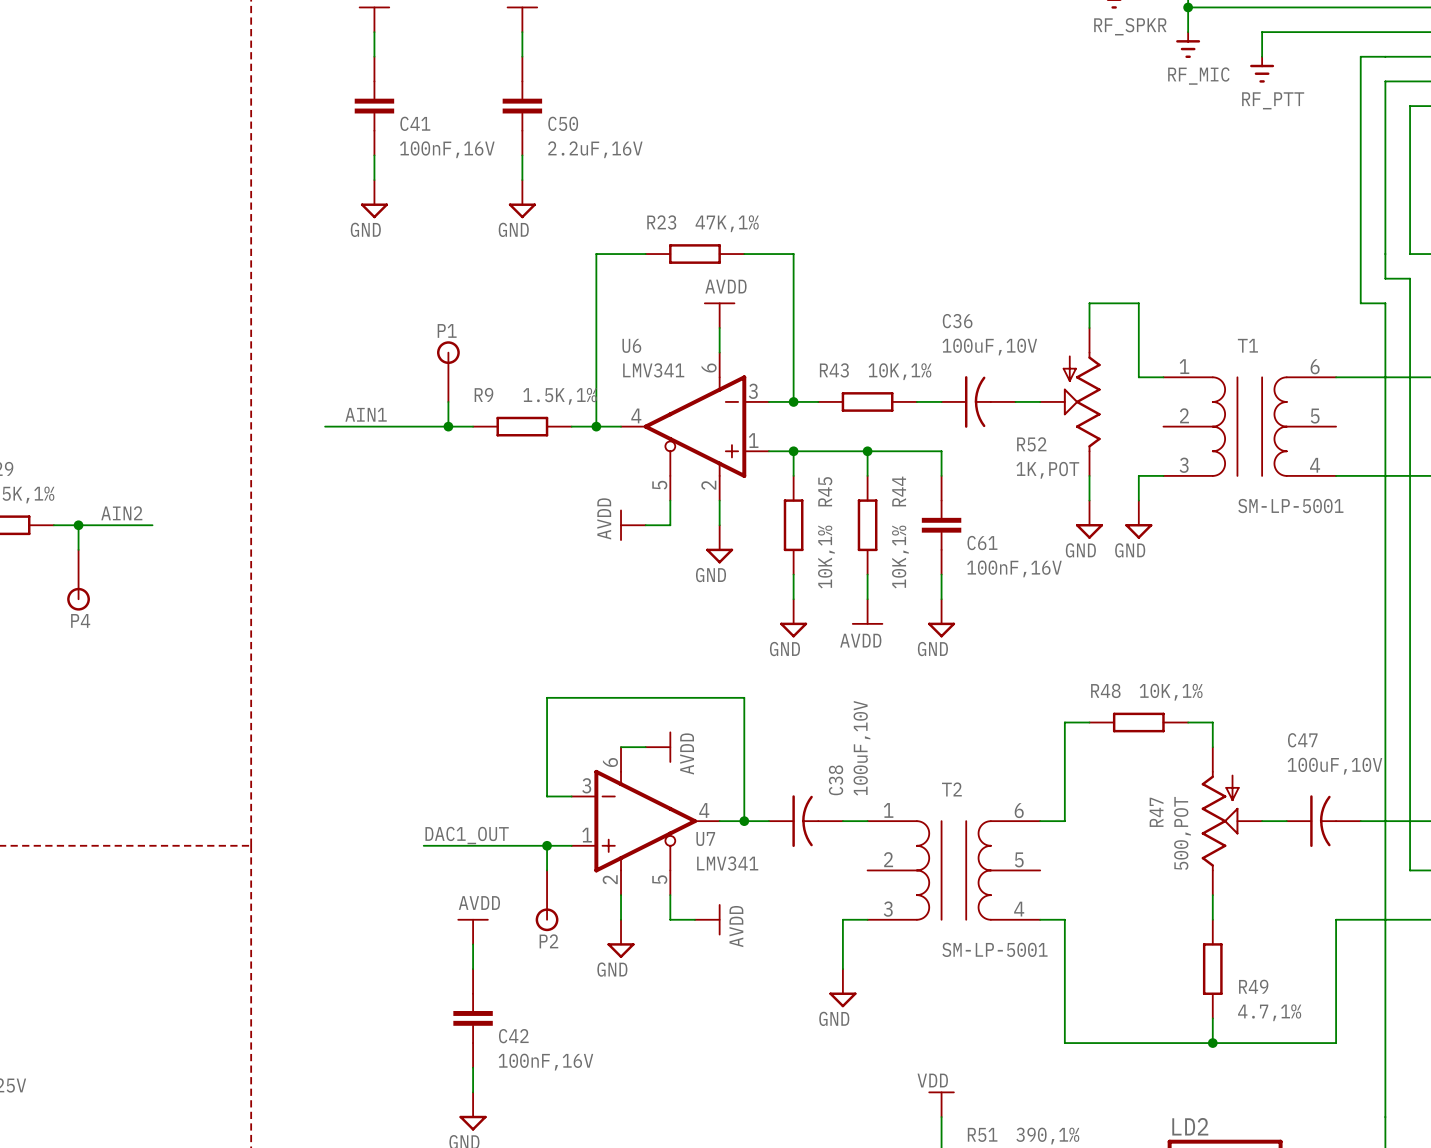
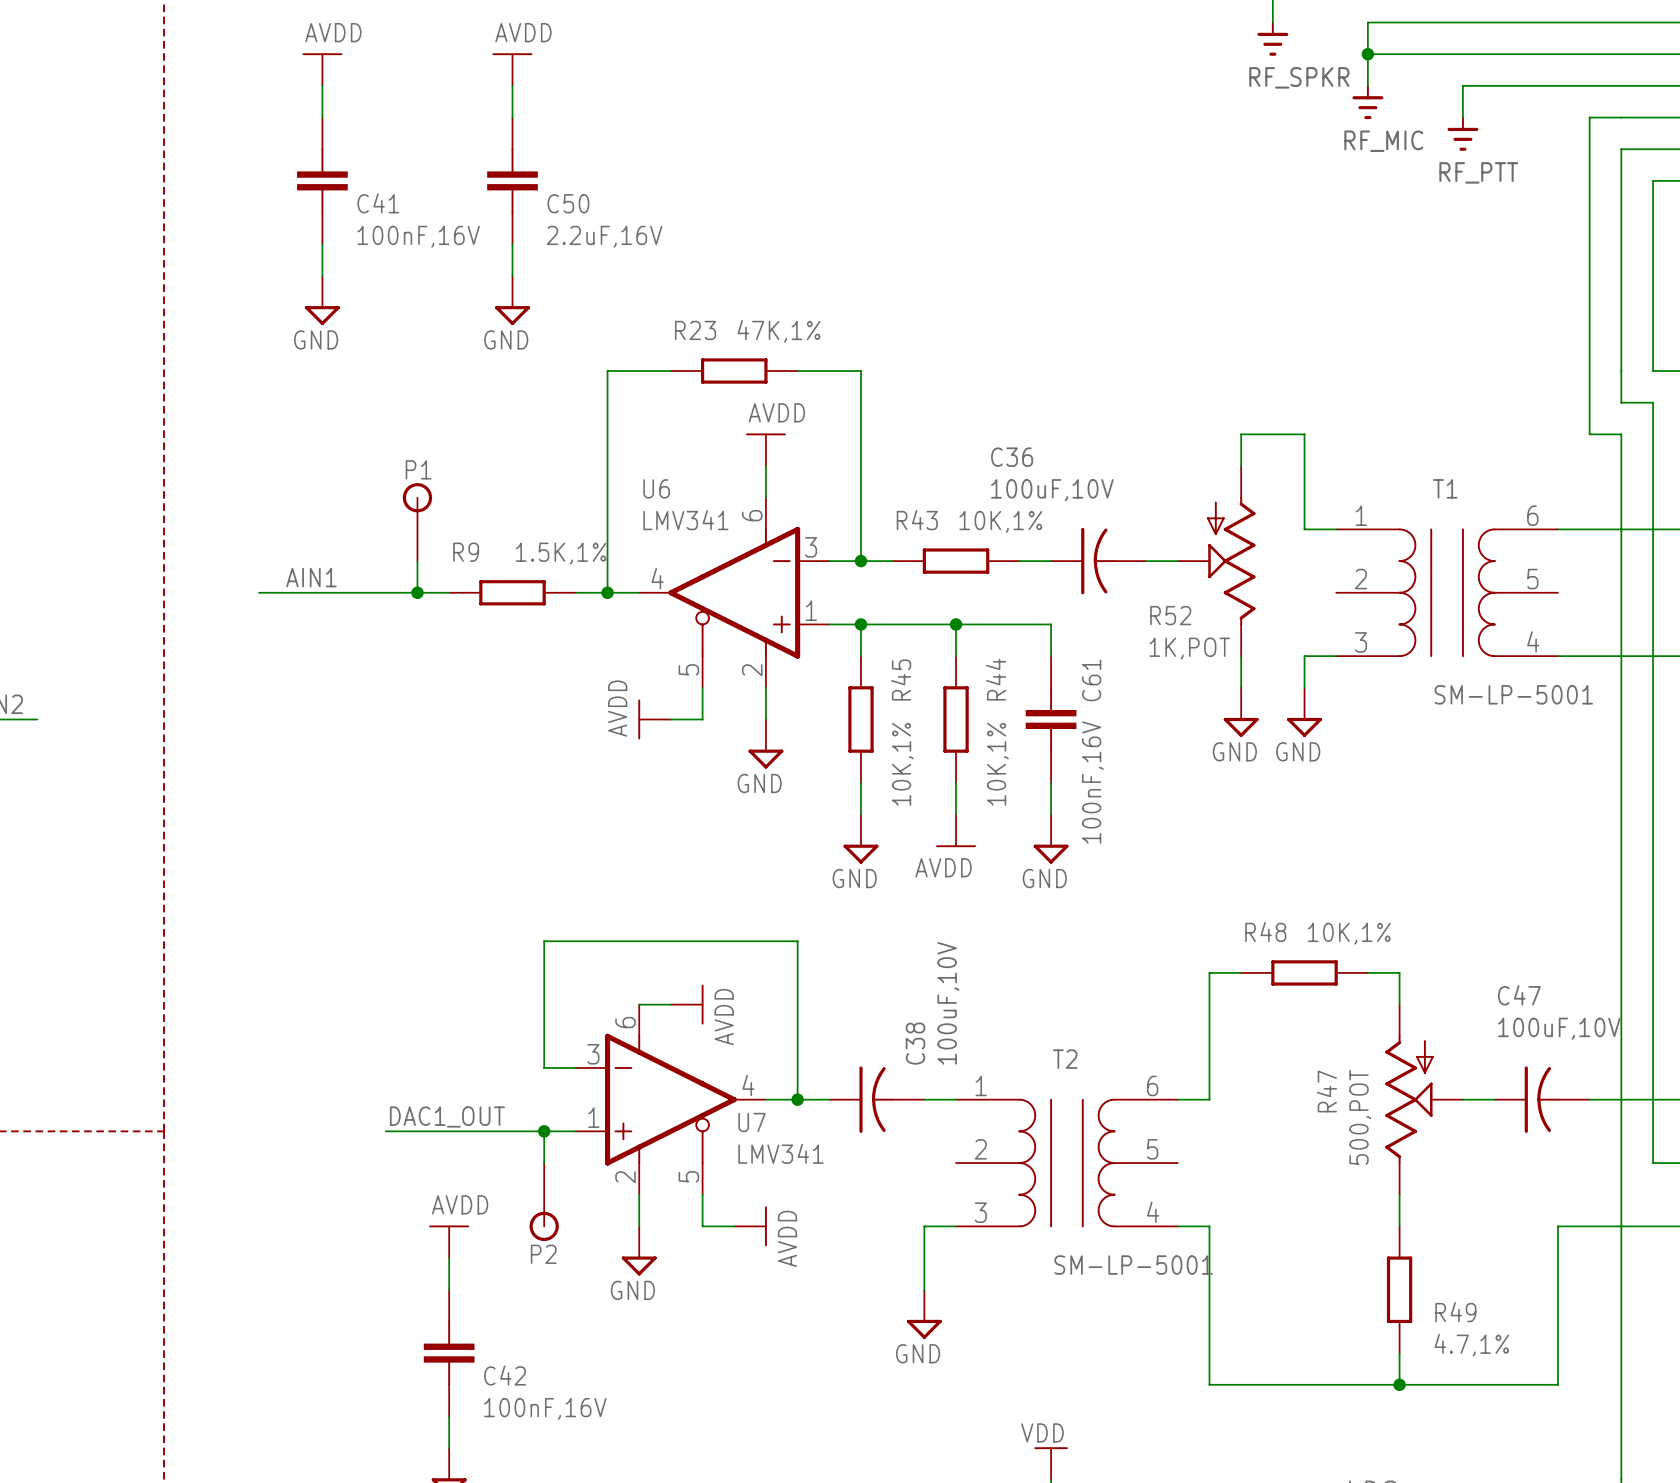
C36 name position: C36 (957, 321) -> C36 (1012, 457)
C36 value position: 100uF,10V (989, 347) -> 100uF,10V (1052, 490)
C61 name rotation: 0° (982, 543) -> 90° counterclockwise (1091, 680)
C61 name position: C61 (982, 543) -> C61 (1091, 680)
C61 value rotation: 0° (1014, 568) -> 90° counterclockwise (1092, 782)

